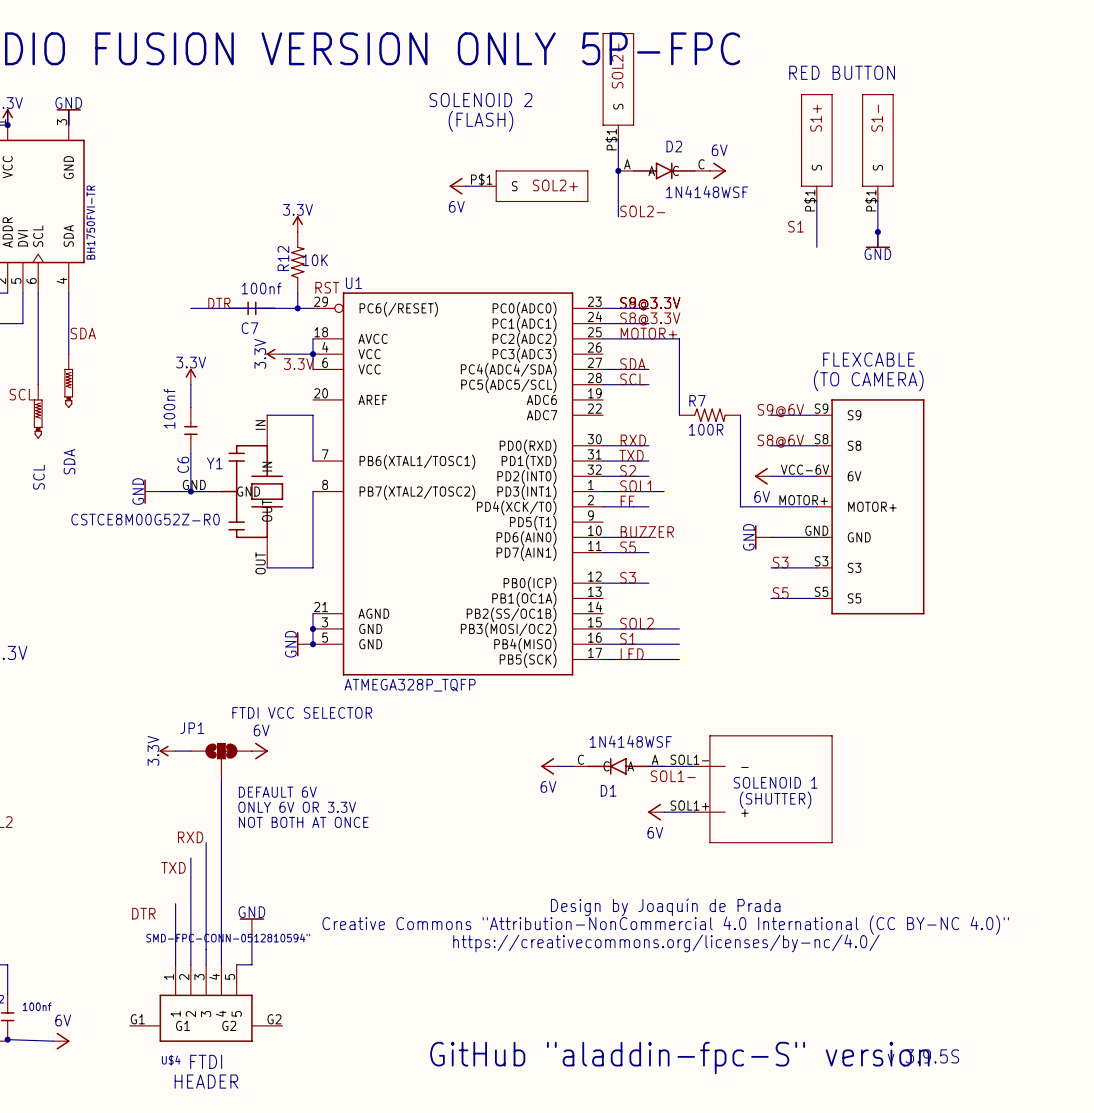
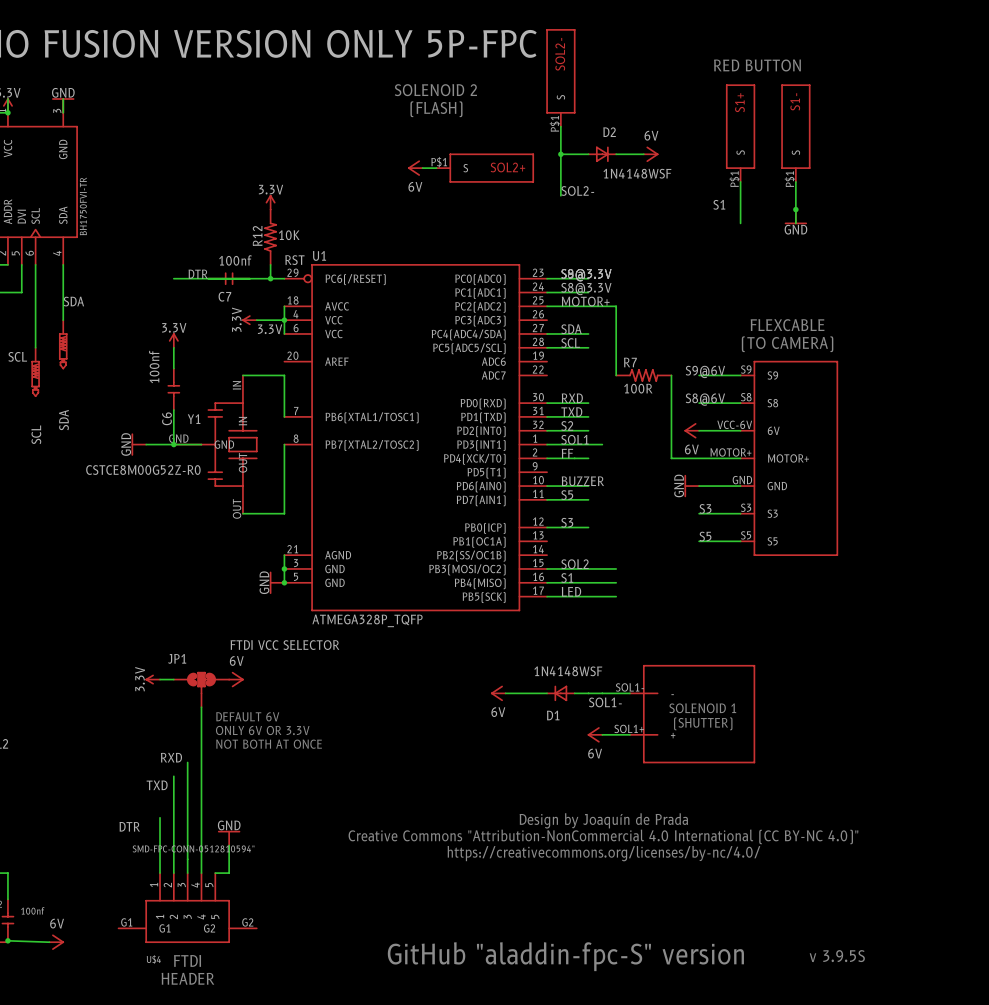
D2 symbol: [618, 162, 710, 180] -> [588, 146, 617, 162]
D1 symbol: [572, 757, 665, 775] -> [547, 685, 575, 701]

